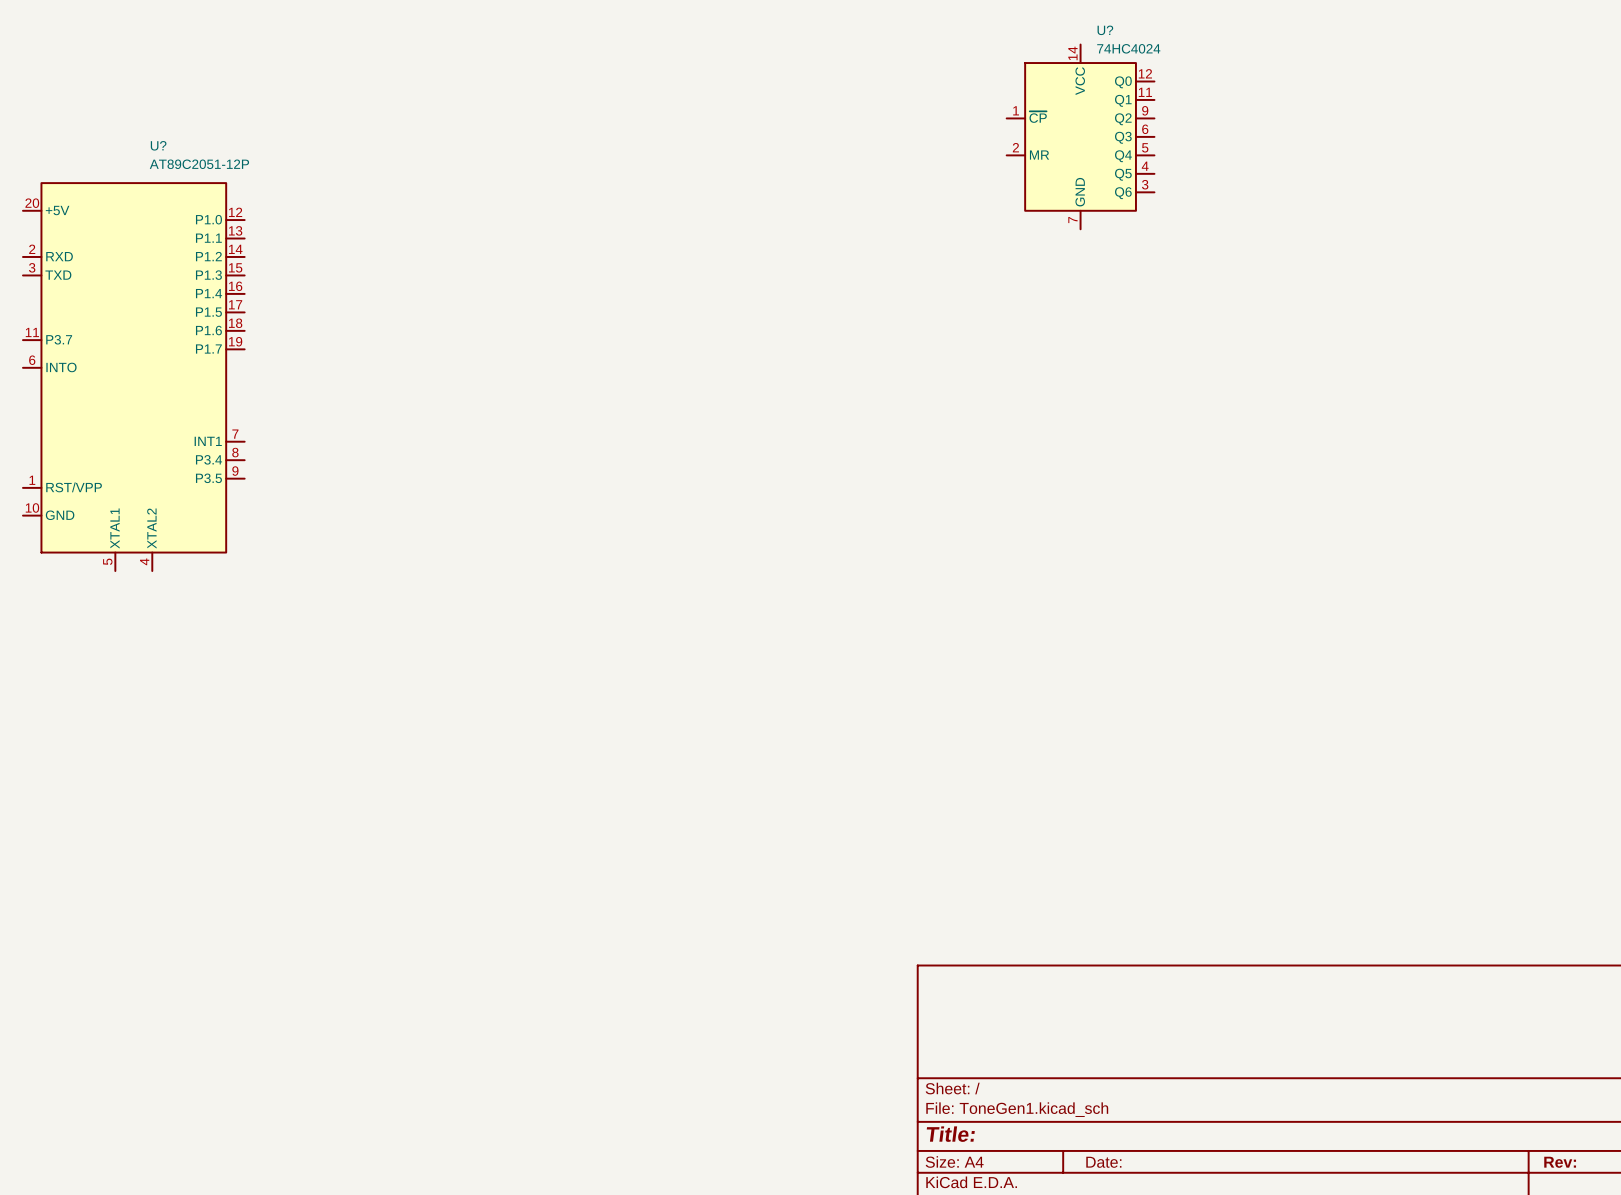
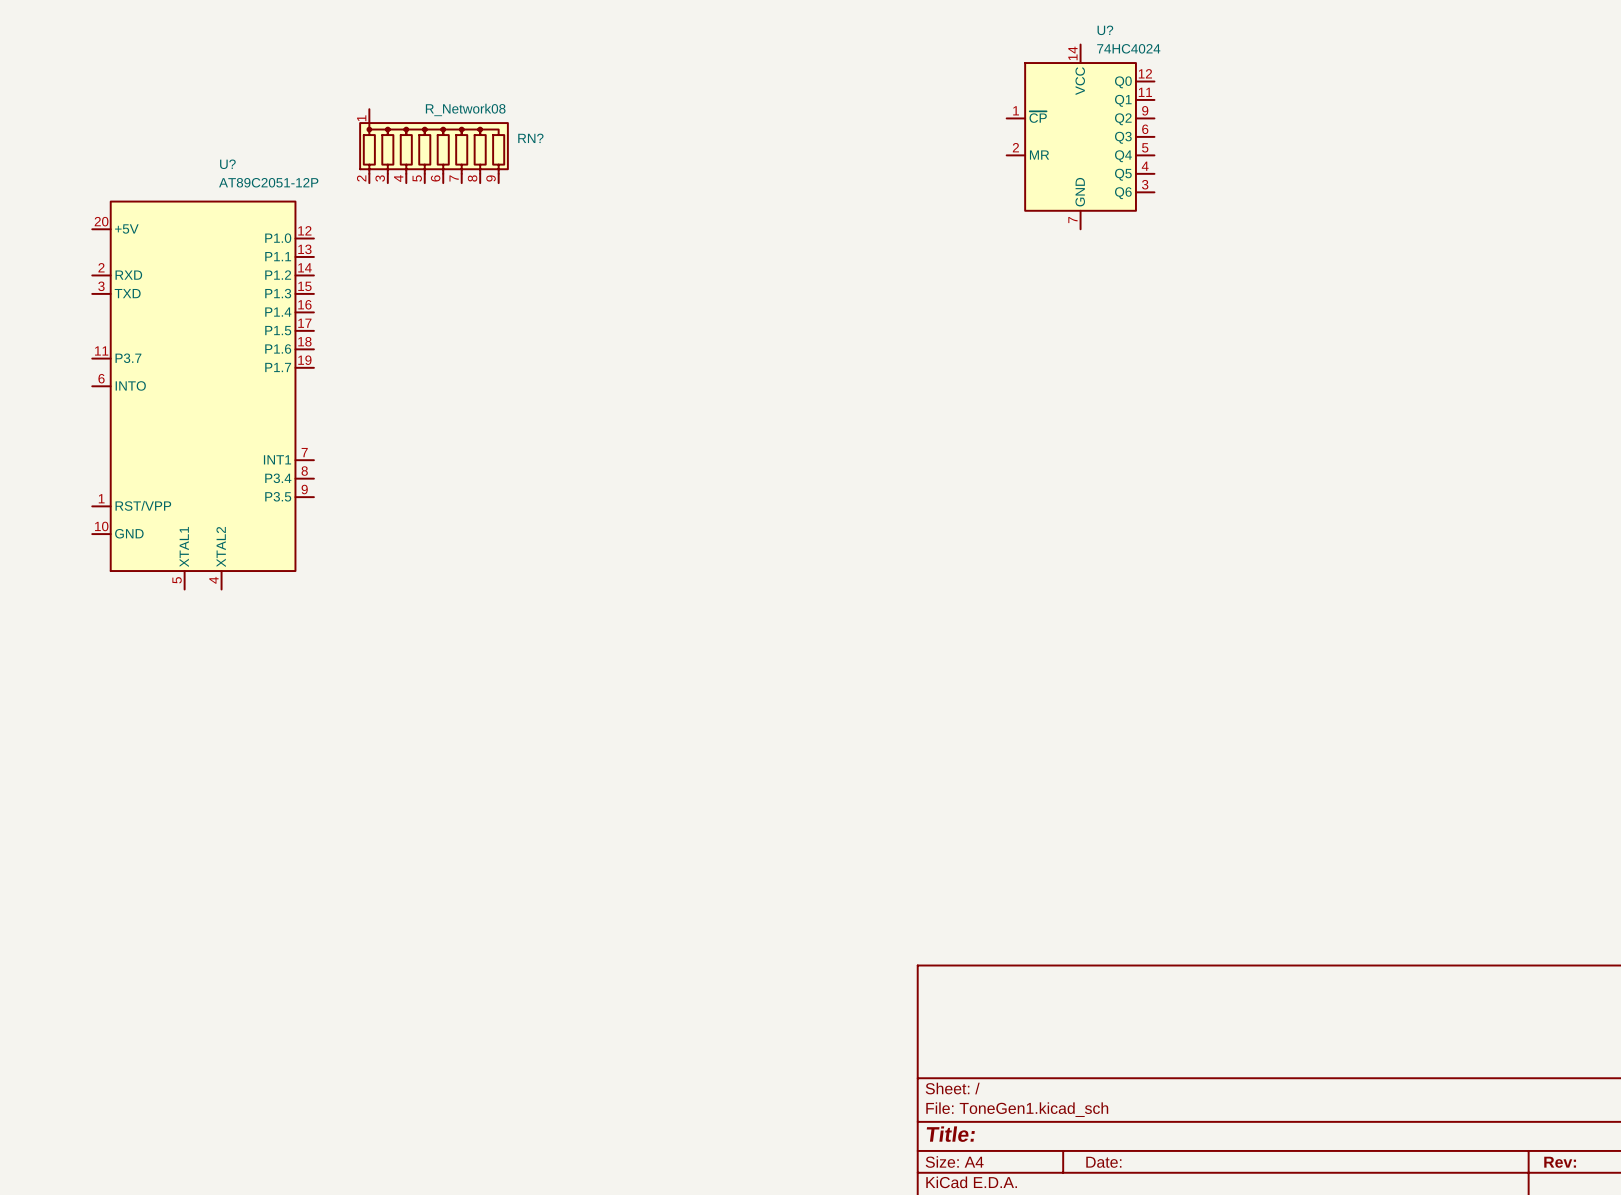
RN?: none -> R_Network08 (434, 146)
U? position: (133, 376) -> (203, 395)

